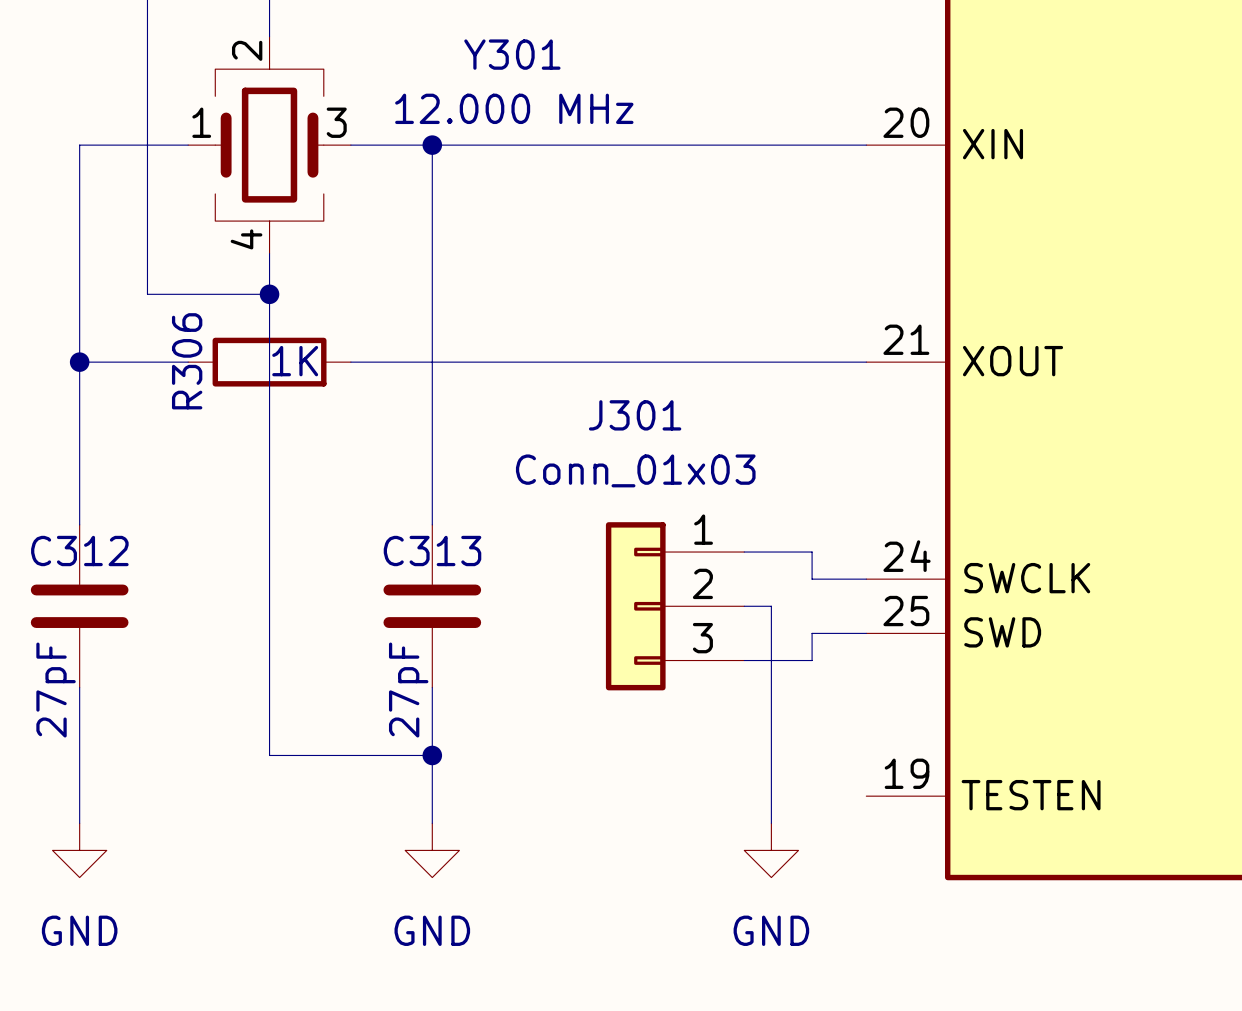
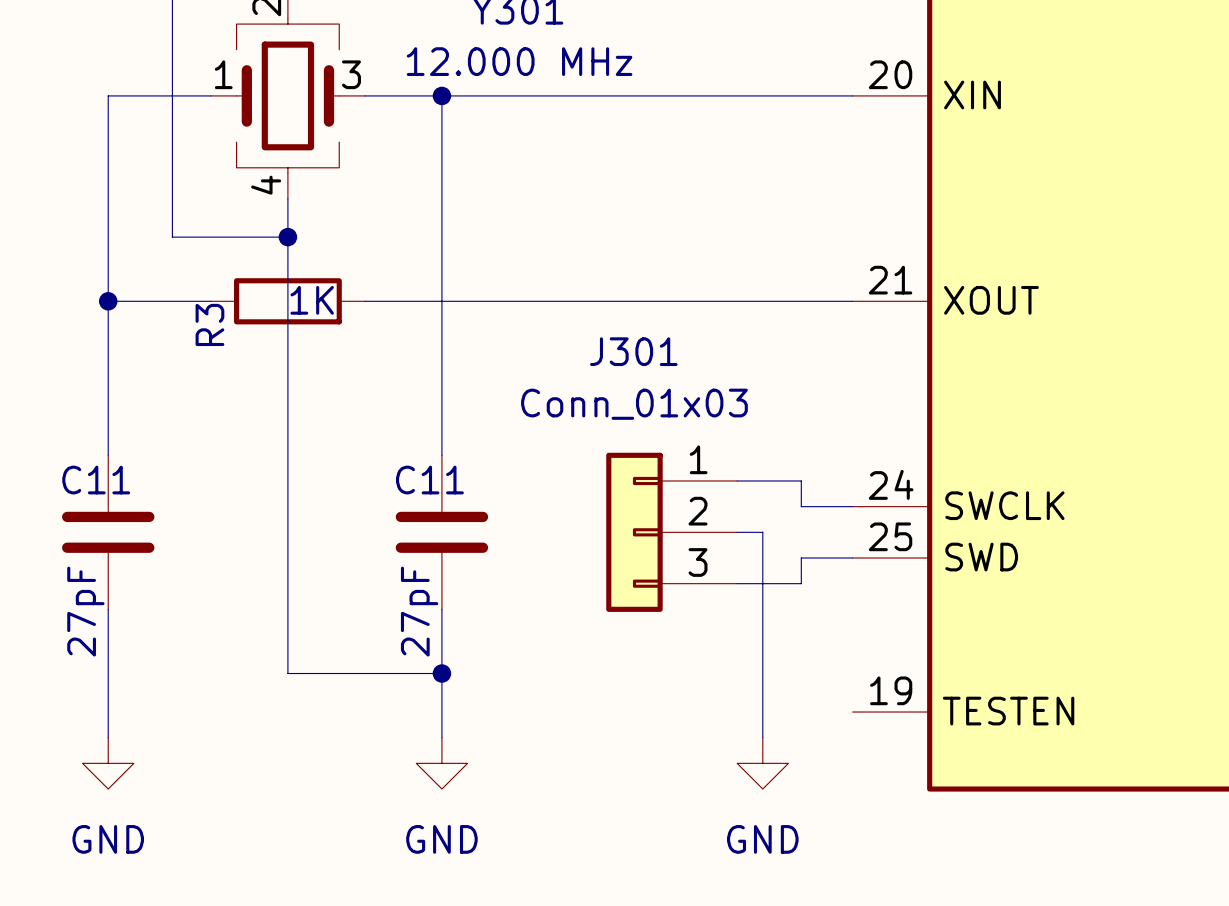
R306 name: R306 (187, 361) -> R3 (209, 324)
C312 name: C312 (79, 551) -> C11 (96, 480)
C313 name: C313 (432, 551) -> C11 (429, 480)

